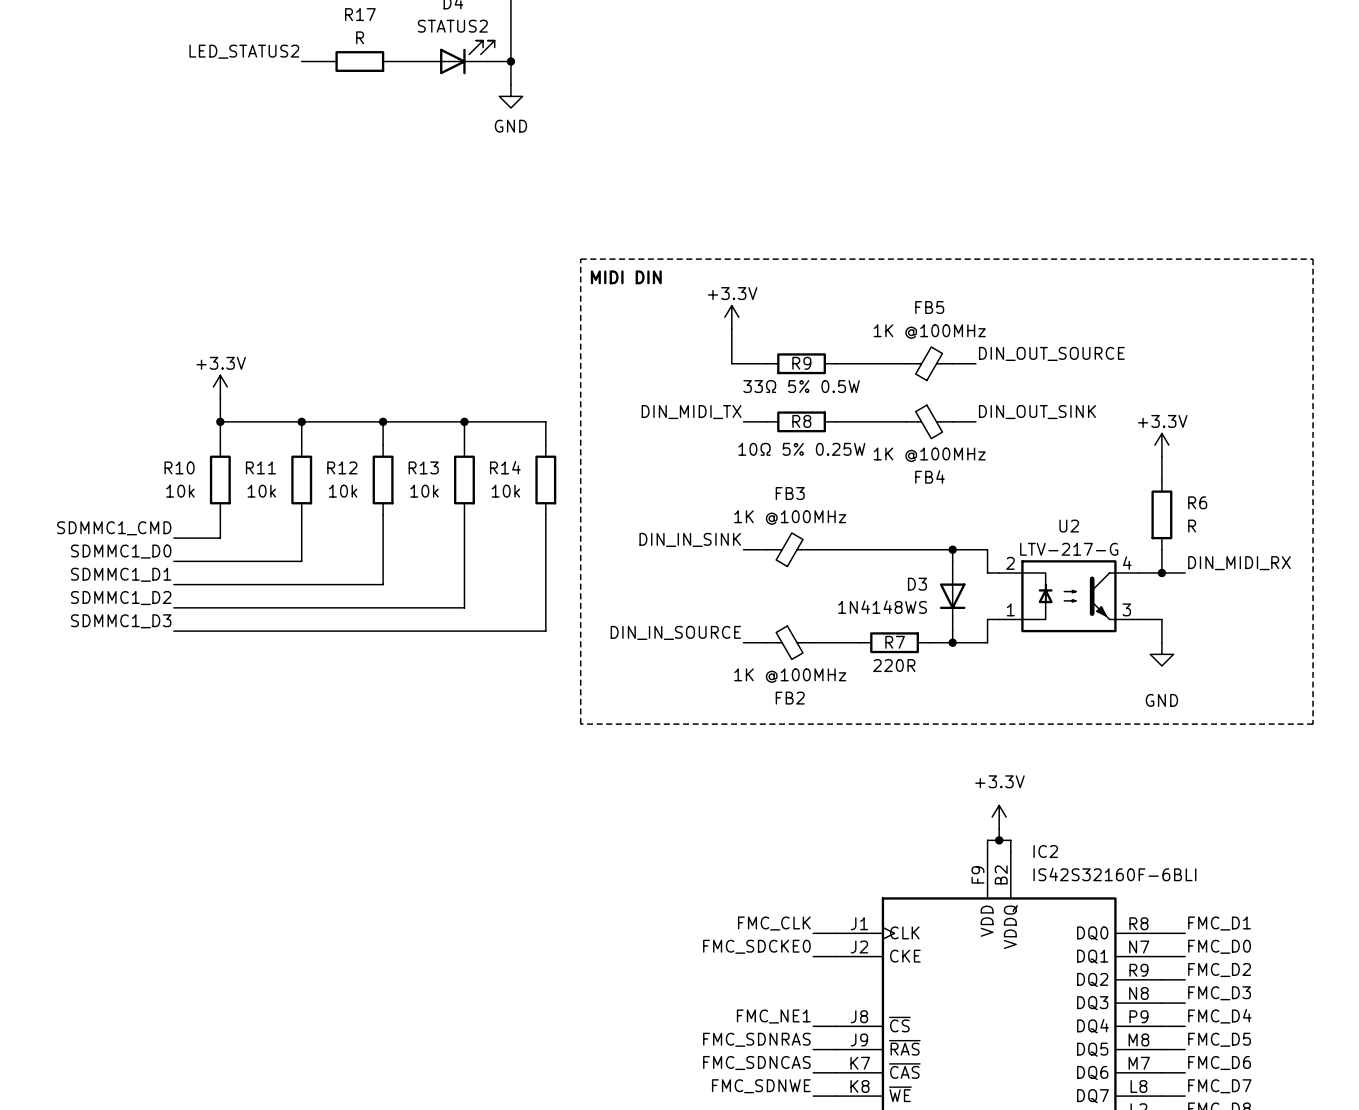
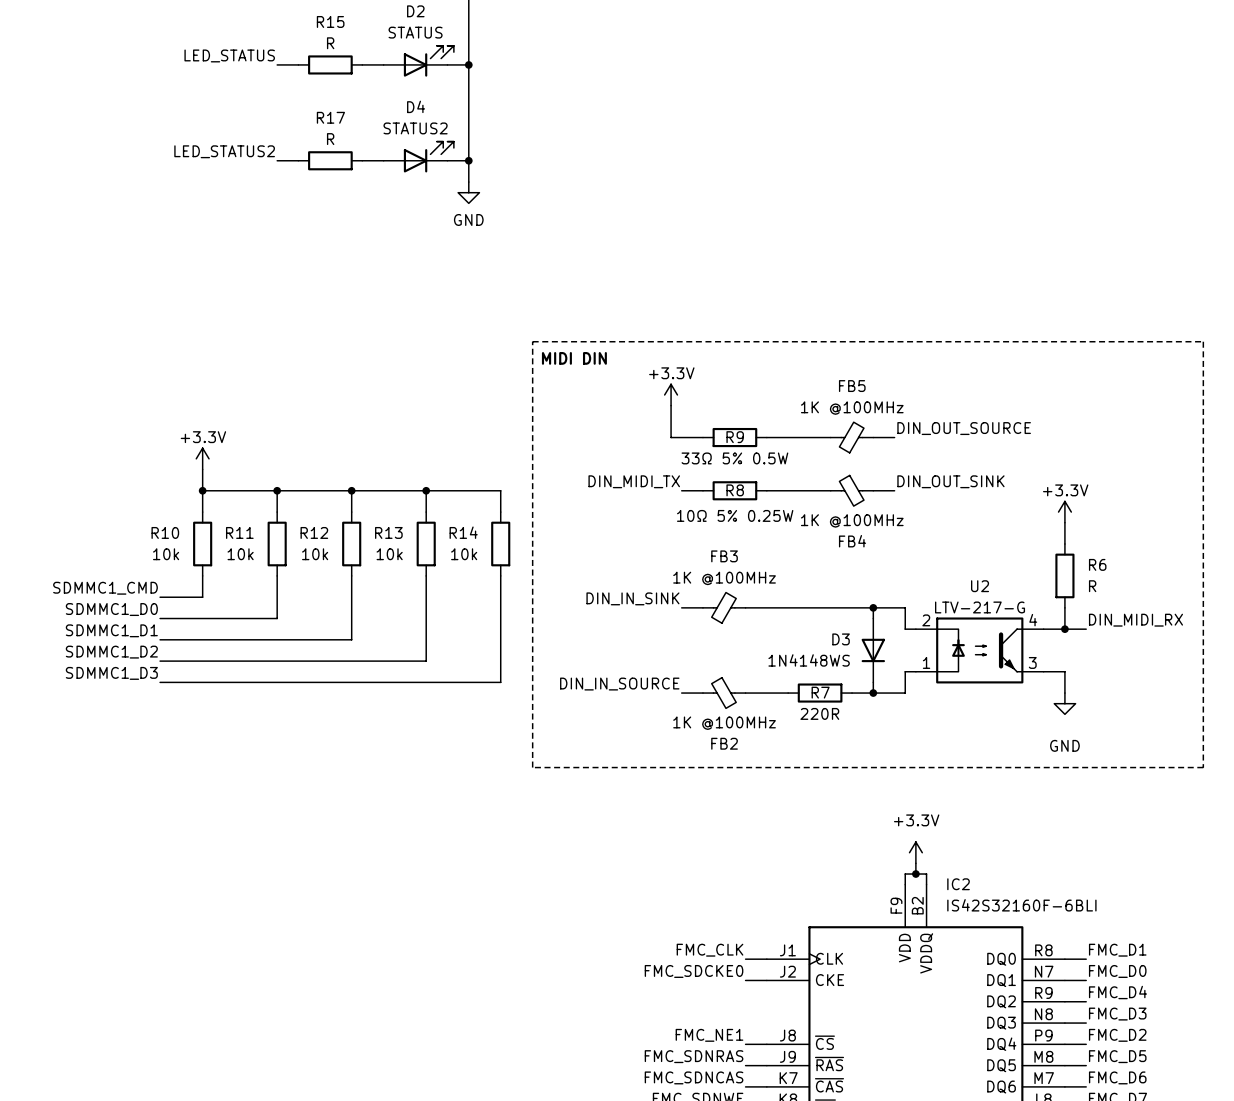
label: FMC_D2 (1219, 970) -> FMC_D4 (1117, 992)
label: FMC_D4 (1219, 1016) -> FMC_D2 (1117, 1035)

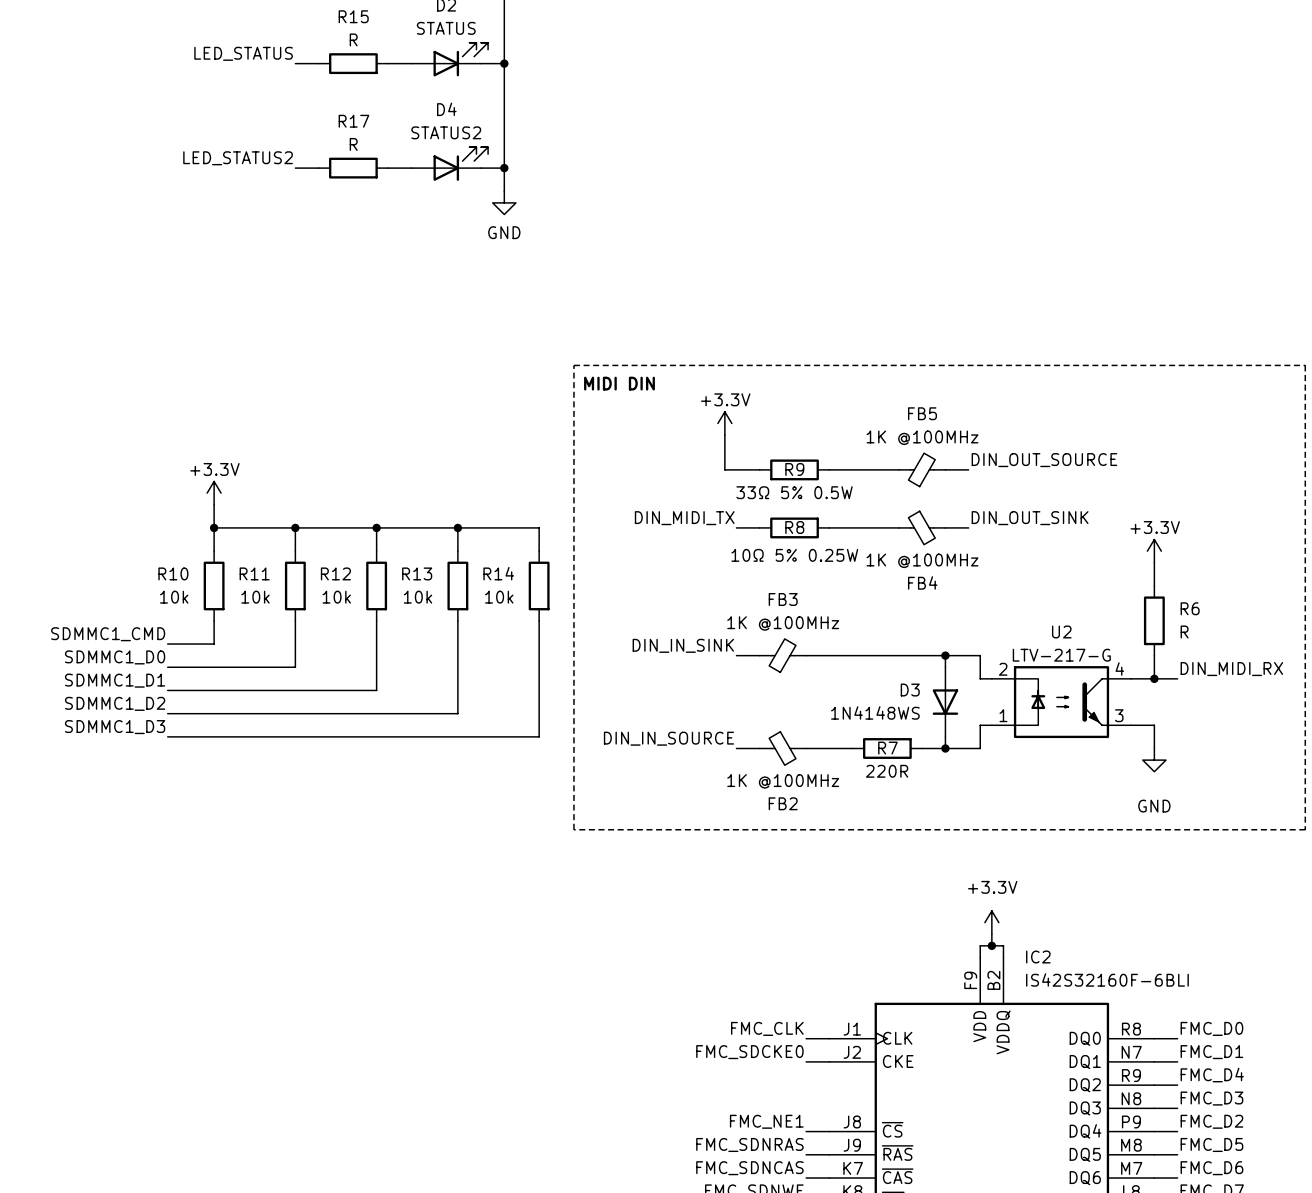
label: FMC_D1 (1117, 950) -> FMC_D0 (1211, 1028)
label: FMC_D0 (1117, 971) -> FMC_D1 (1211, 1052)

